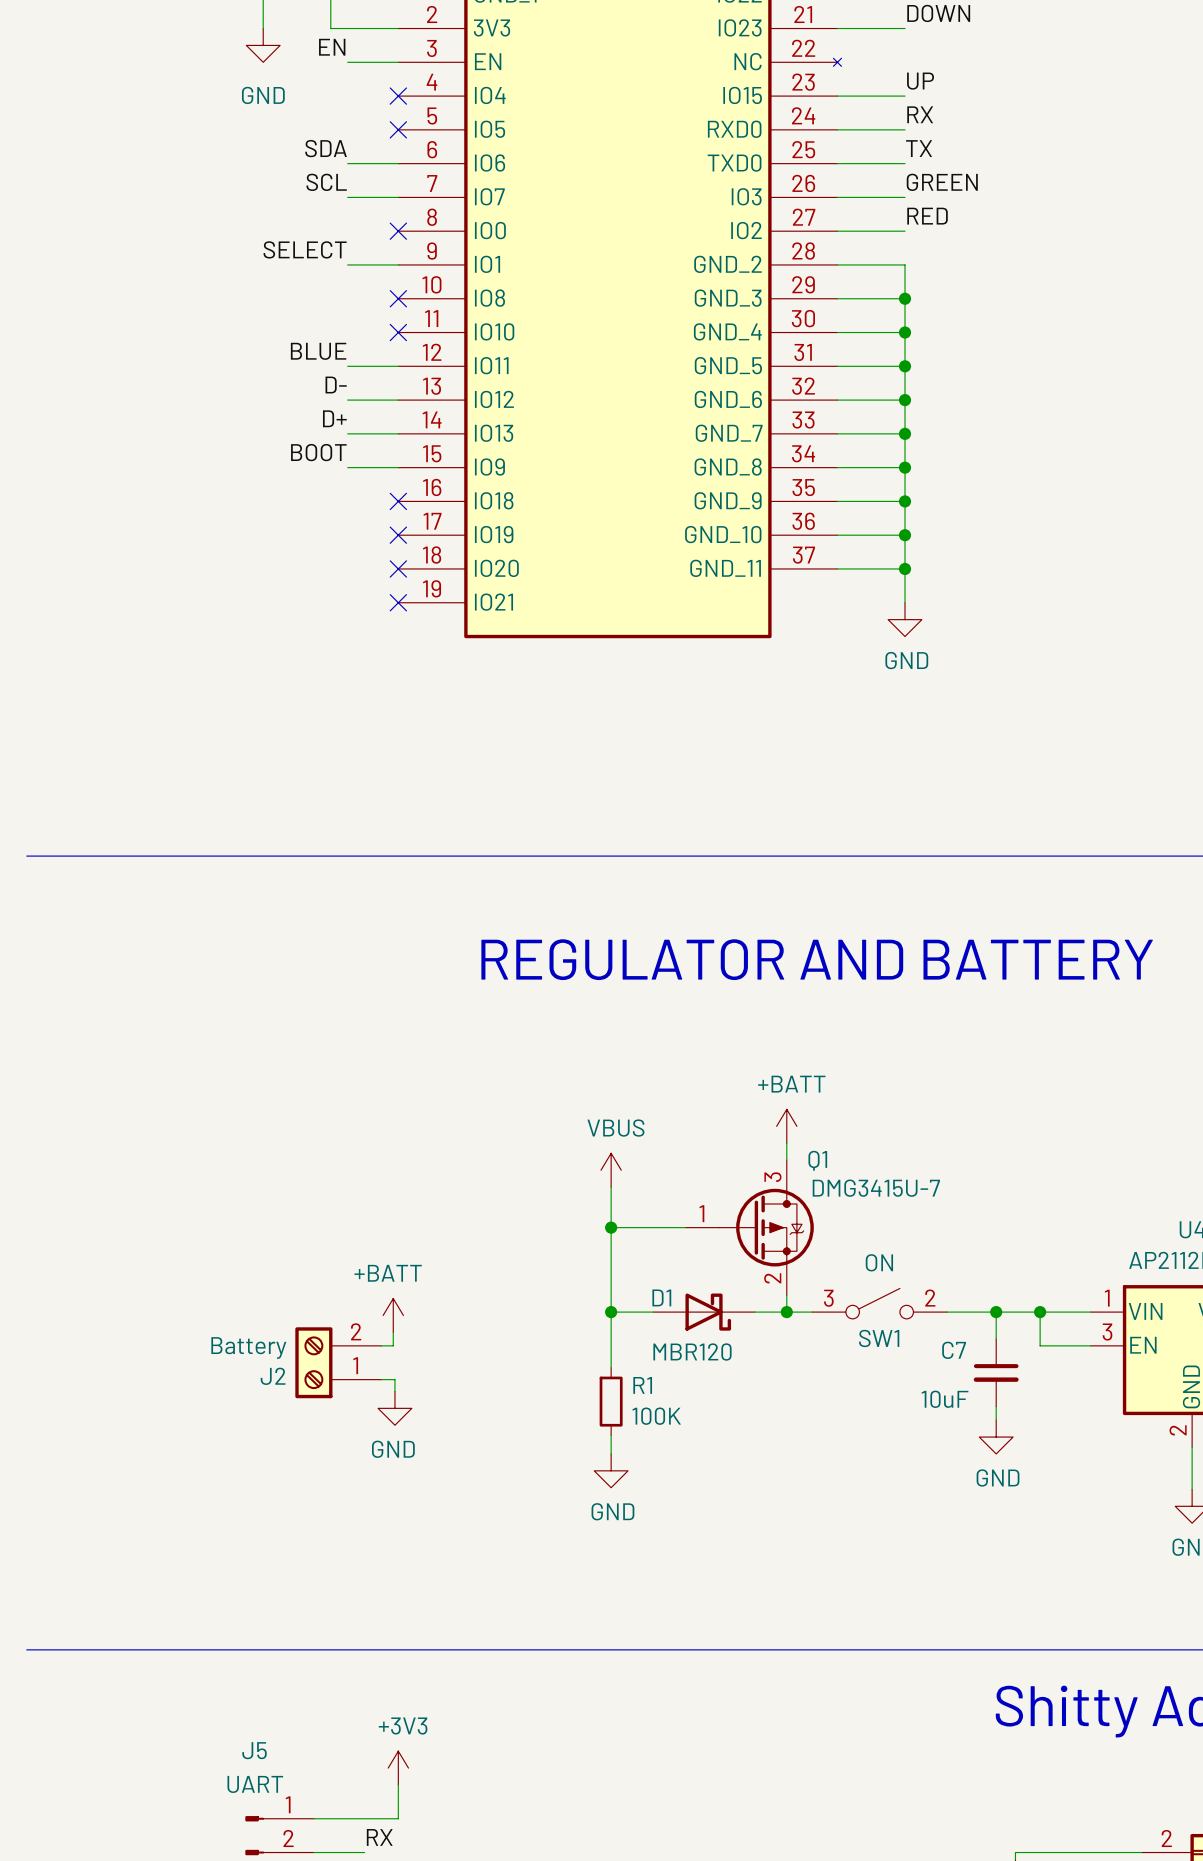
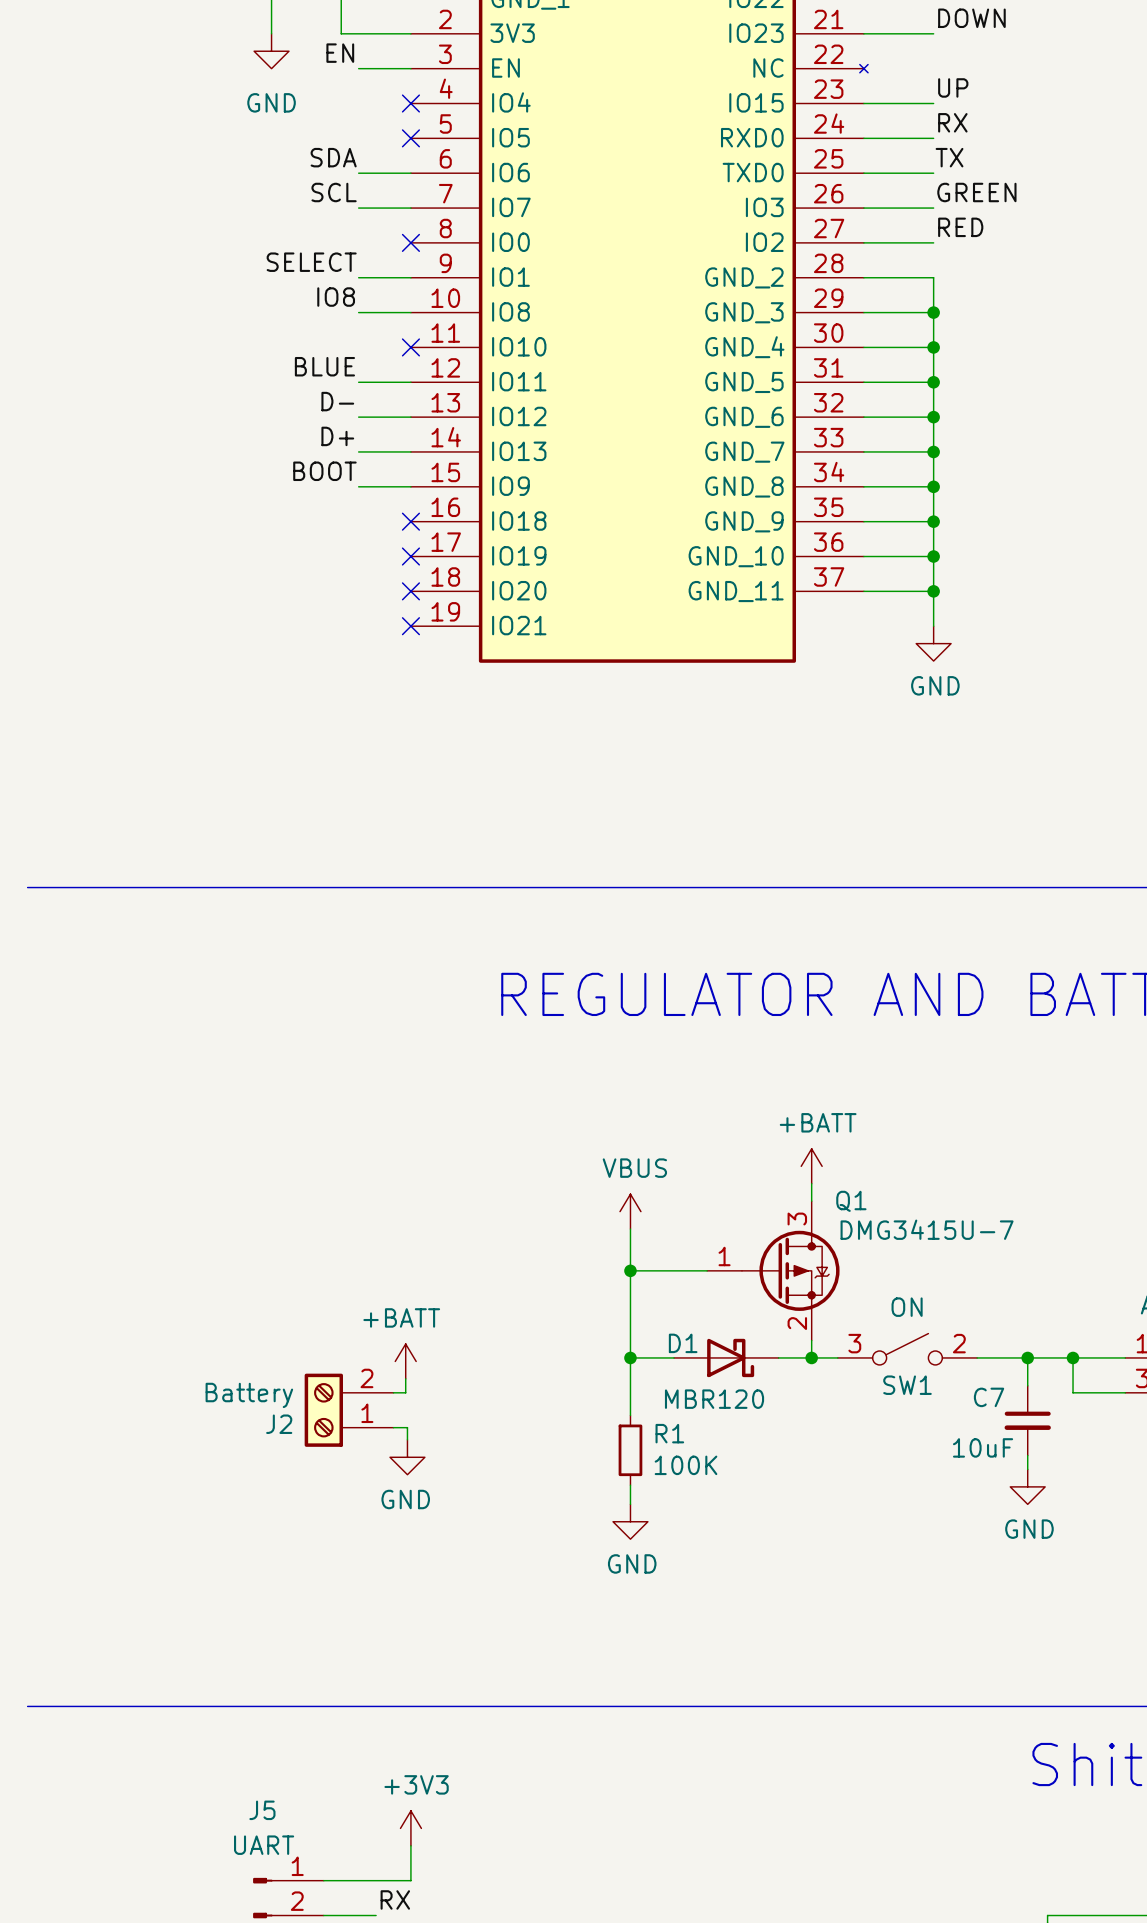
label: none -> IO8 (336, 297)
wire: none -> (358, 312) (410, 312)
no-connect mark: (398, 298) -> none

